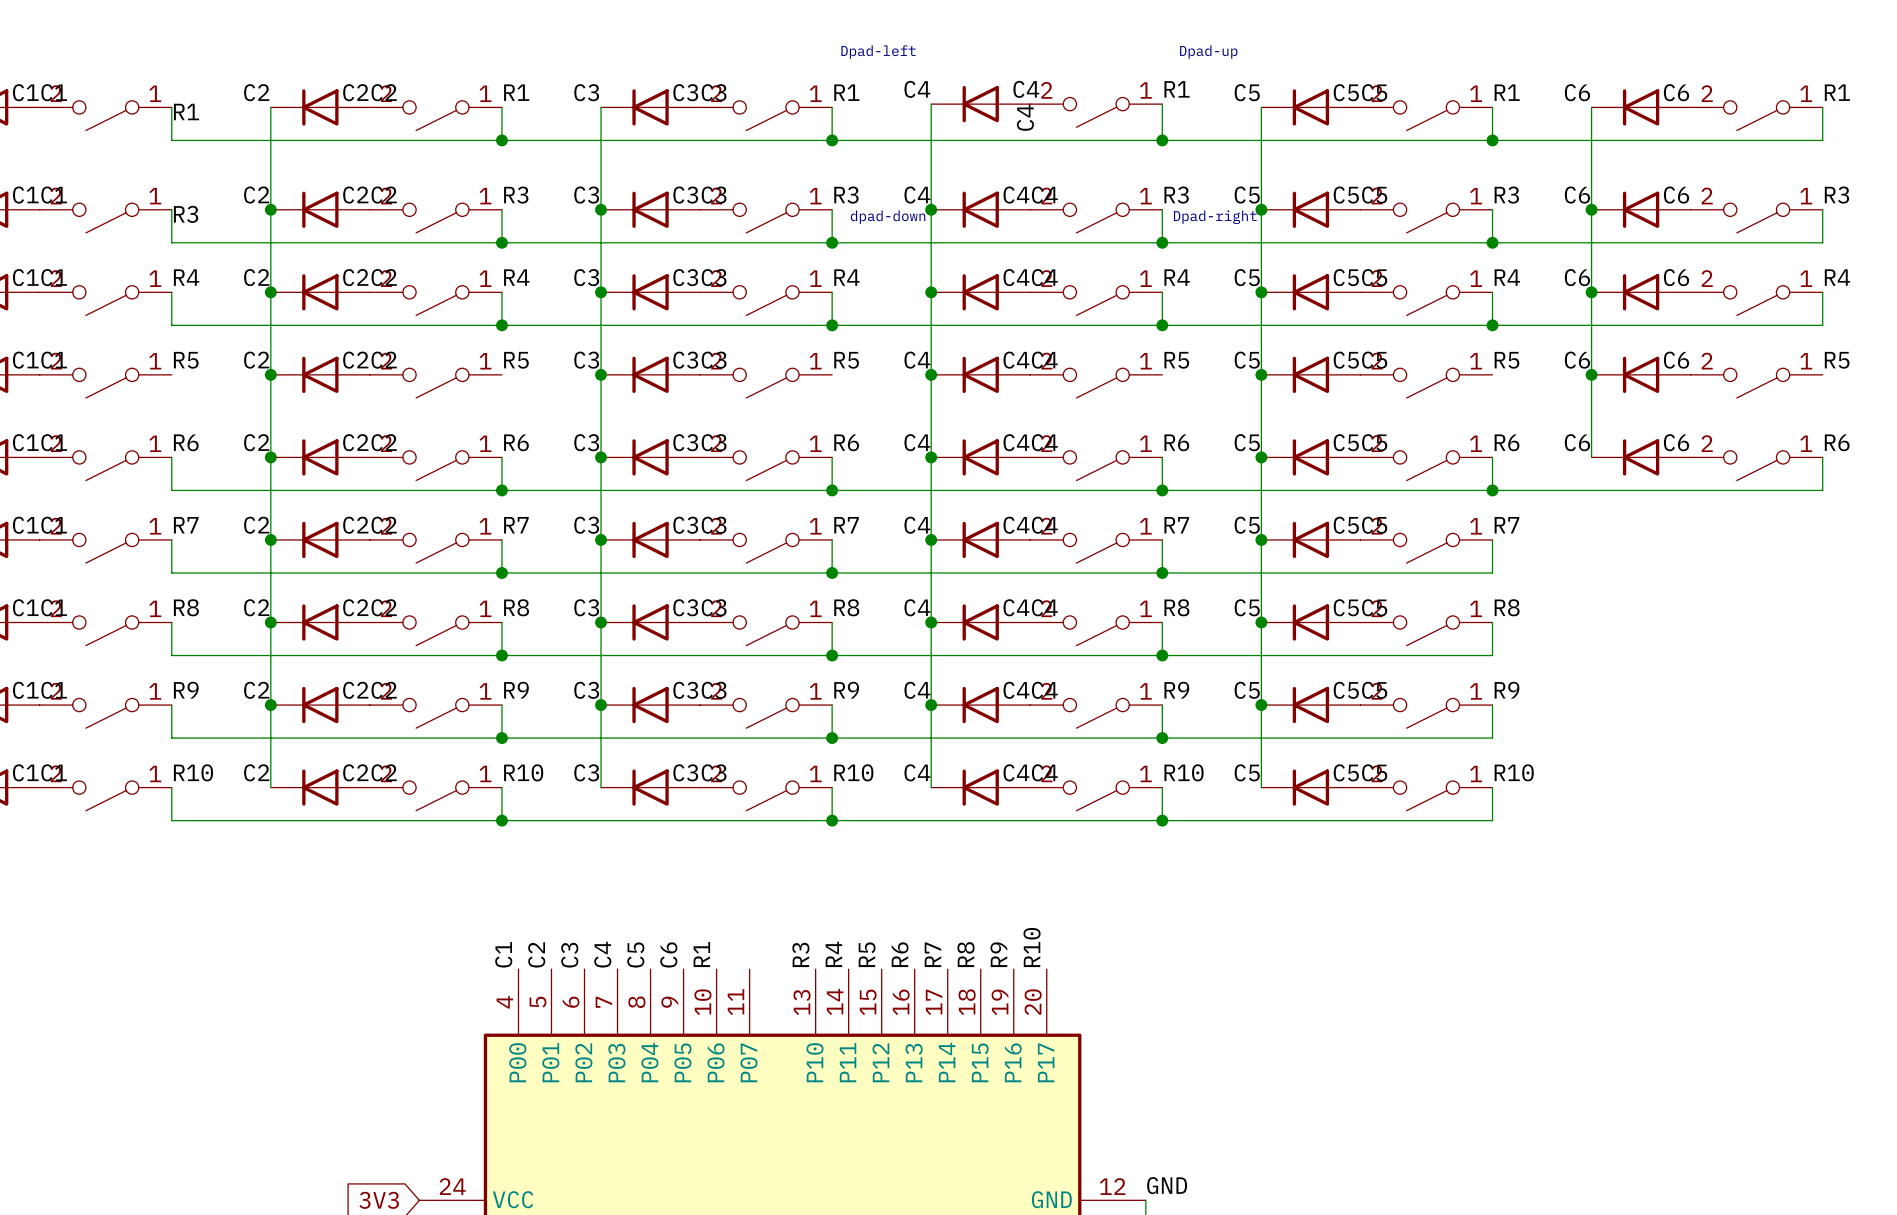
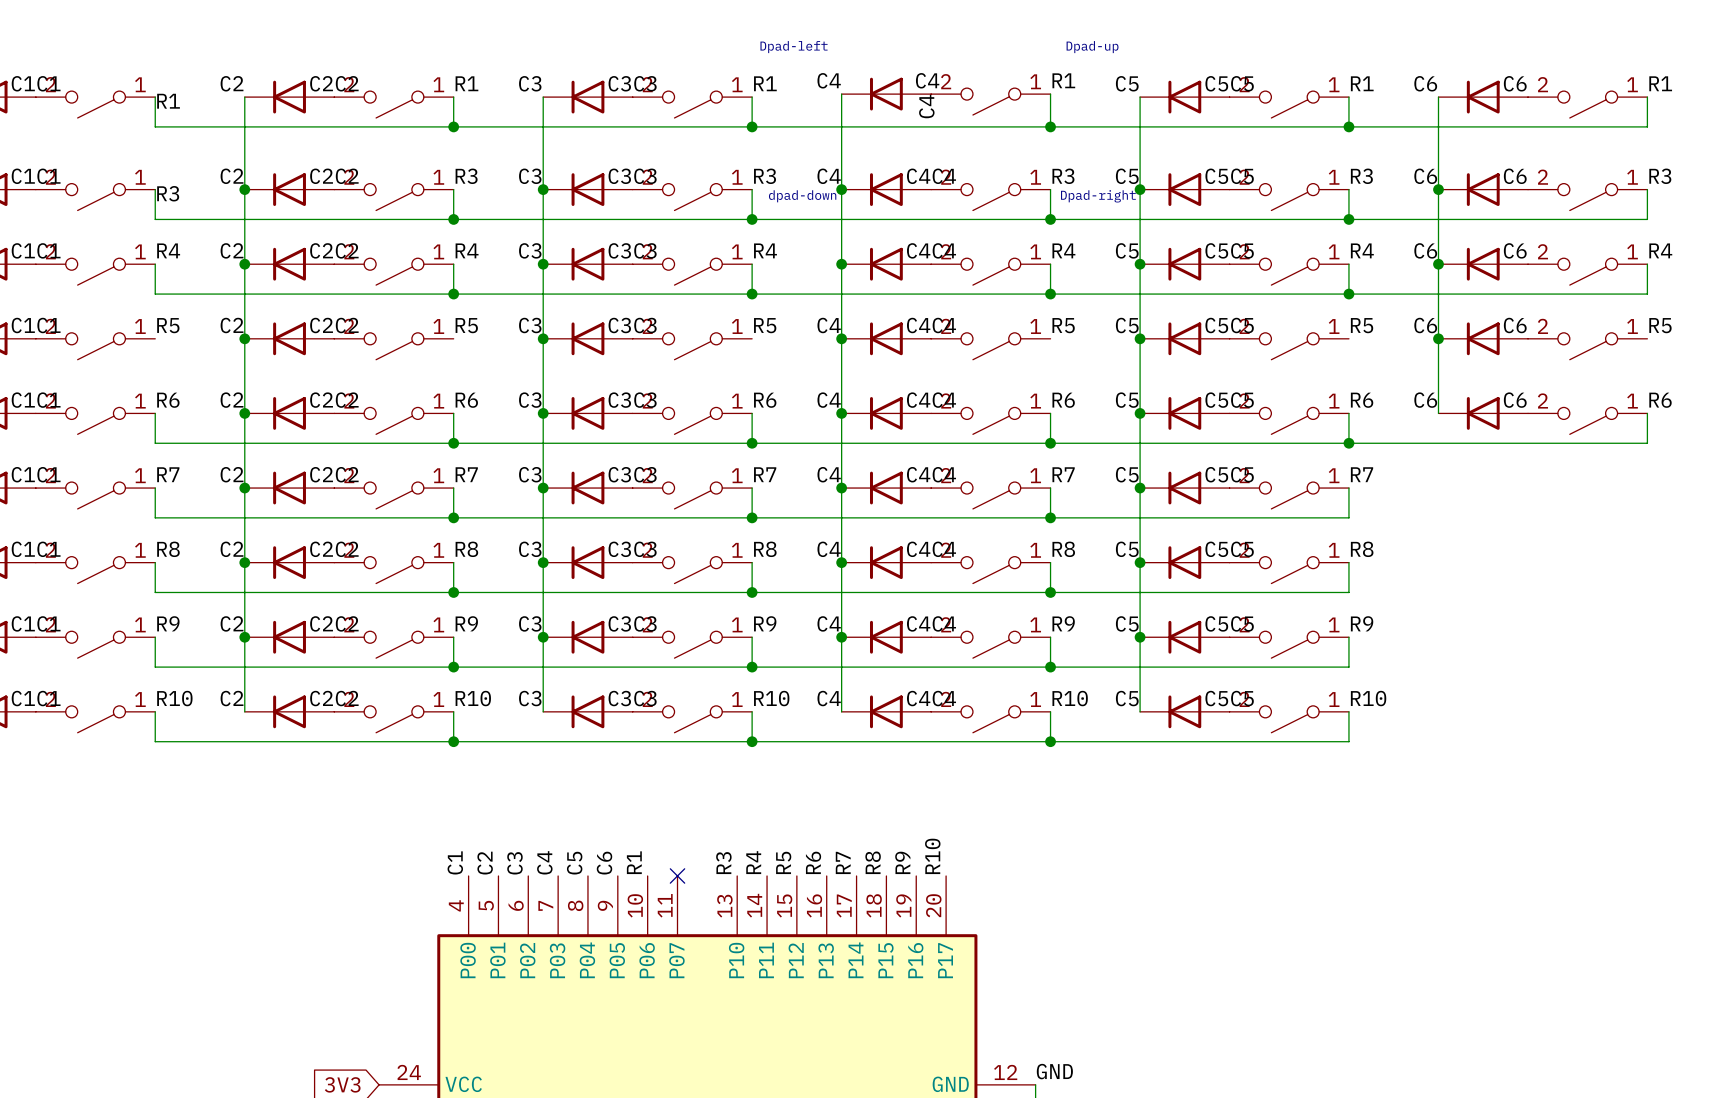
no-connect mark: none -> (677, 875)

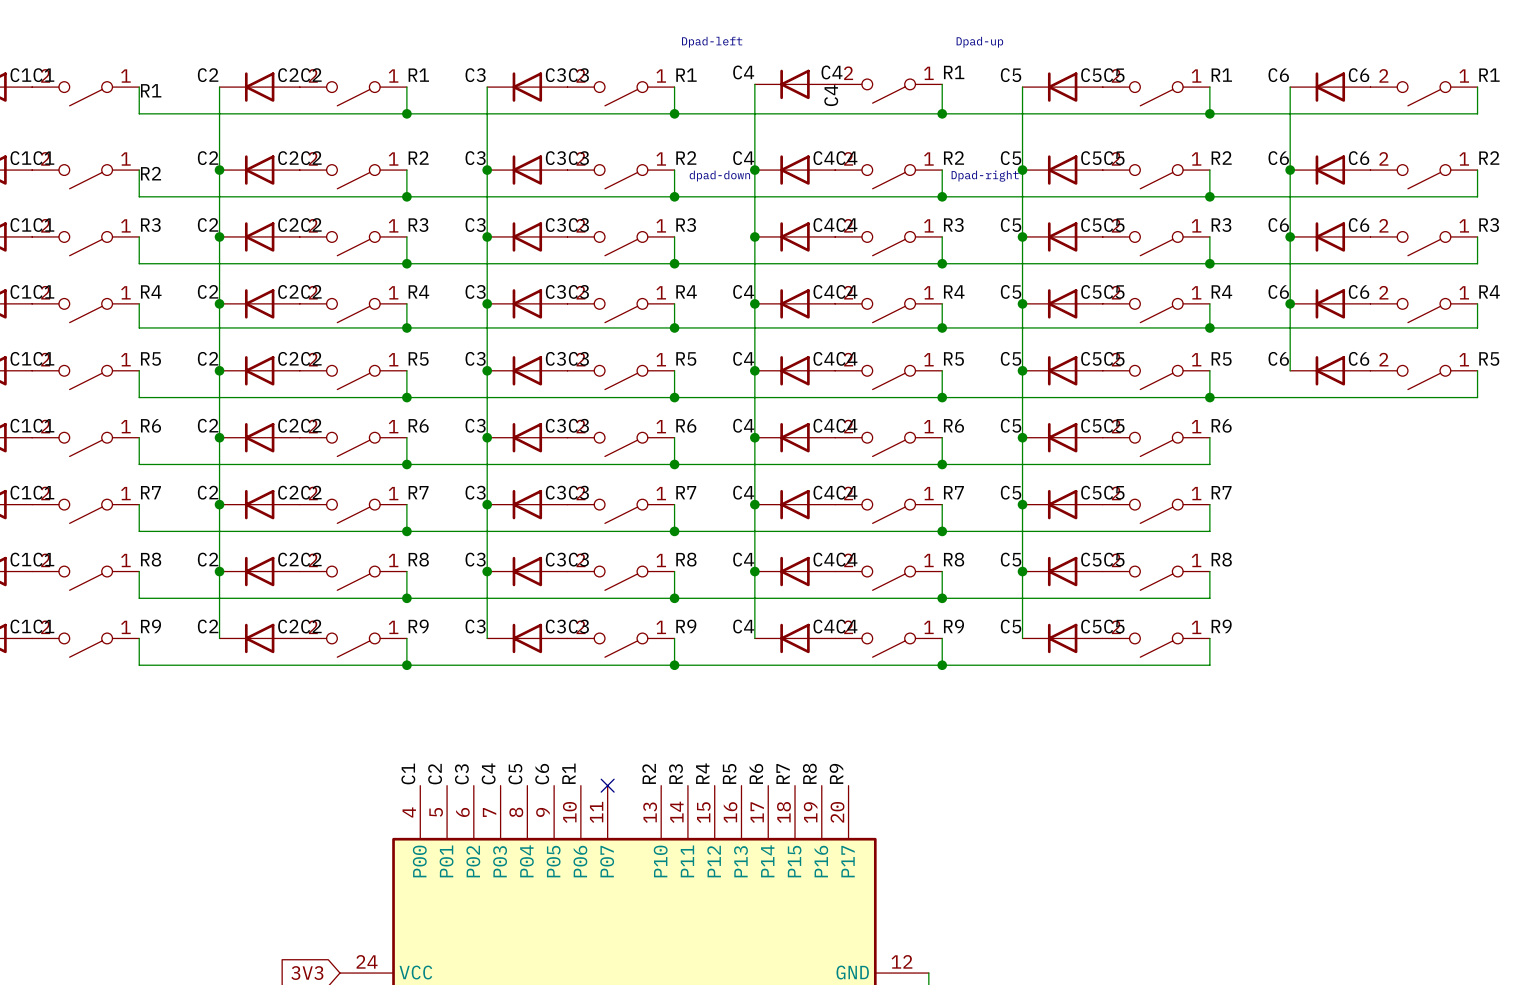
label: R3 (466, 176) -> R2 (418, 157)
label: R3 (765, 176) -> R2 (686, 157)
label: R3 (1063, 176) -> R2 (953, 157)
label: R3 (1361, 176) -> R2 (1221, 157)
label: R3 (1660, 176) -> R2 (1489, 157)
label: R3 (168, 193) -> R2 (151, 173)
label: R4 (168, 250) -> R3 (150, 225)
label: R4 (467, 250) -> R3 (418, 225)
label: R4 (765, 250) -> R3 (686, 225)
label: R4 (1063, 250) -> R3 (953, 225)
label: R4 (1362, 250) -> R3 (1221, 225)
label: R4 (1660, 250) -> R3 (1489, 225)
label: R5 (168, 325) -> R4 (151, 291)
label: R5 (466, 325) -> R4 (418, 291)
label: R5 (765, 325) -> R4 (686, 291)
label: R5 (1063, 325) -> R4 (954, 291)
label: R5 (1362, 325) -> R4 (1221, 291)
label: R5 (1660, 325) -> R4 (1489, 291)
wire: none -> (139, 303) (139, 327) (1477, 327) (1477, 303)
wire: none -> (406, 303) (406, 327)
wire: none -> (674, 303) (674, 327)
wire: none -> (942, 303) (942, 327)
wire: none -> (1209, 303) (1209, 327)
junction: none -> (406, 327)
junction: none -> (674, 327)
junction: none -> (942, 327)
junction: none -> (1209, 327)
label: R6 (168, 400) -> R5 (150, 358)
label: R6 (466, 400) -> R5 (418, 358)
label: R6 (765, 400) -> R5 (686, 358)
label: R6 (1063, 400) -> R5 (953, 358)
label: R6 (1362, 400) -> R5 (1221, 358)
label: R6 (1660, 400) -> R5 (1489, 358)
label: R7 (168, 474) -> R6 (151, 425)
label: R7 (466, 474) -> R6 (418, 425)
label: R7 (765, 474) -> R6 (686, 425)
label: R7 (1063, 474) -> R6 (953, 425)
label: R7 (1362, 474) -> R6 (1221, 425)
label: R8 (168, 549) -> R7 (150, 492)
label: R8 (466, 549) -> R7 (418, 492)
label: R8 (765, 549) -> R7 (686, 492)
label: R8 (1063, 549) -> R7 (953, 492)
label: R8 (1362, 549) -> R7 (1221, 492)
label: R9 (168, 623) -> R8 (151, 559)
label: R9 (466, 623) -> R8 (418, 559)
label: R9 (765, 623) -> R8 (686, 559)
label: R9 (1063, 623) -> R8 (954, 559)
label: R9 (1362, 623) -> R8 (1221, 559)
label: R10 (174, 698) -> R9 (151, 626)
label: R10 (473, 698) -> R9 (418, 626)
label: R10 (771, 698) -> R9 (686, 626)
label: R10 (1070, 698) -> R9 (953, 626)
label: R10 (1368, 698) -> R9 (1221, 626)
label: R10 (932, 856) -> R9 (836, 773)
label: R4 (753, 862) -> R3 (676, 774)
label: R5 (783, 862) -> R4 (702, 773)
label: R6 (813, 862) -> R5 (729, 773)
label: R7 (843, 862) -> R6 (756, 773)
label: R8 (873, 862) -> R7 (783, 773)
label: R9 (902, 862) -> R8 (809, 773)
label: R3 (723, 863) -> R2 (649, 773)
label: GND (1054, 1071) -> none

